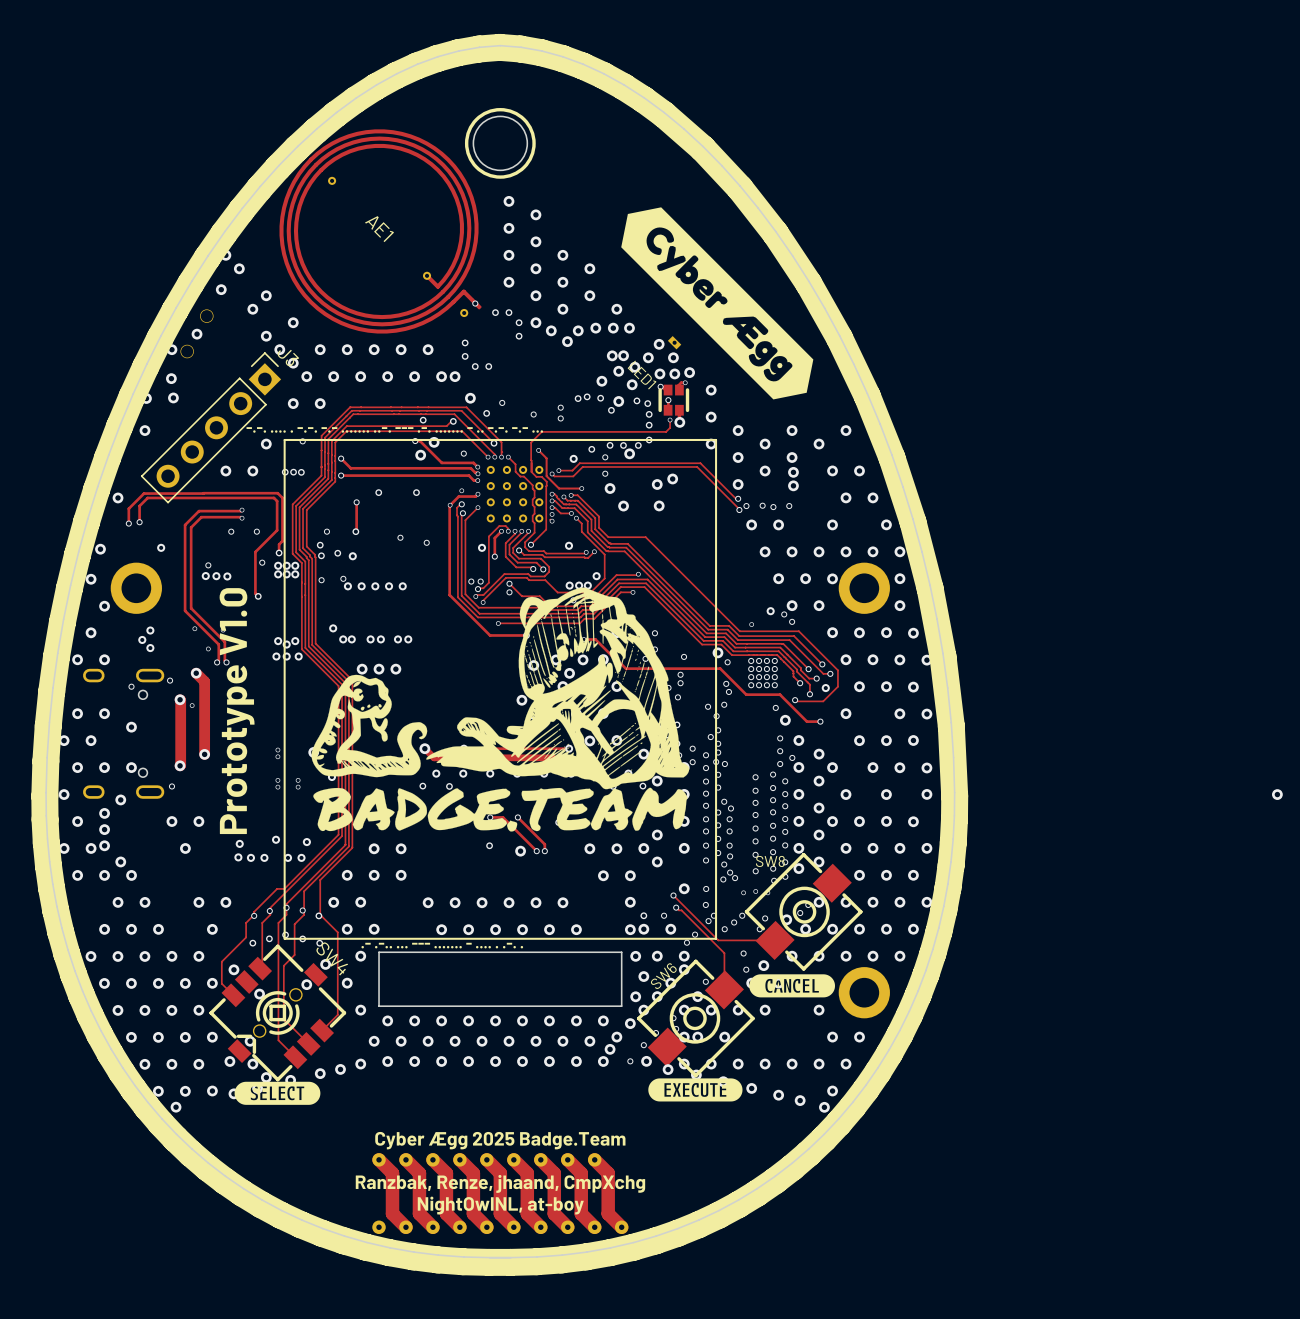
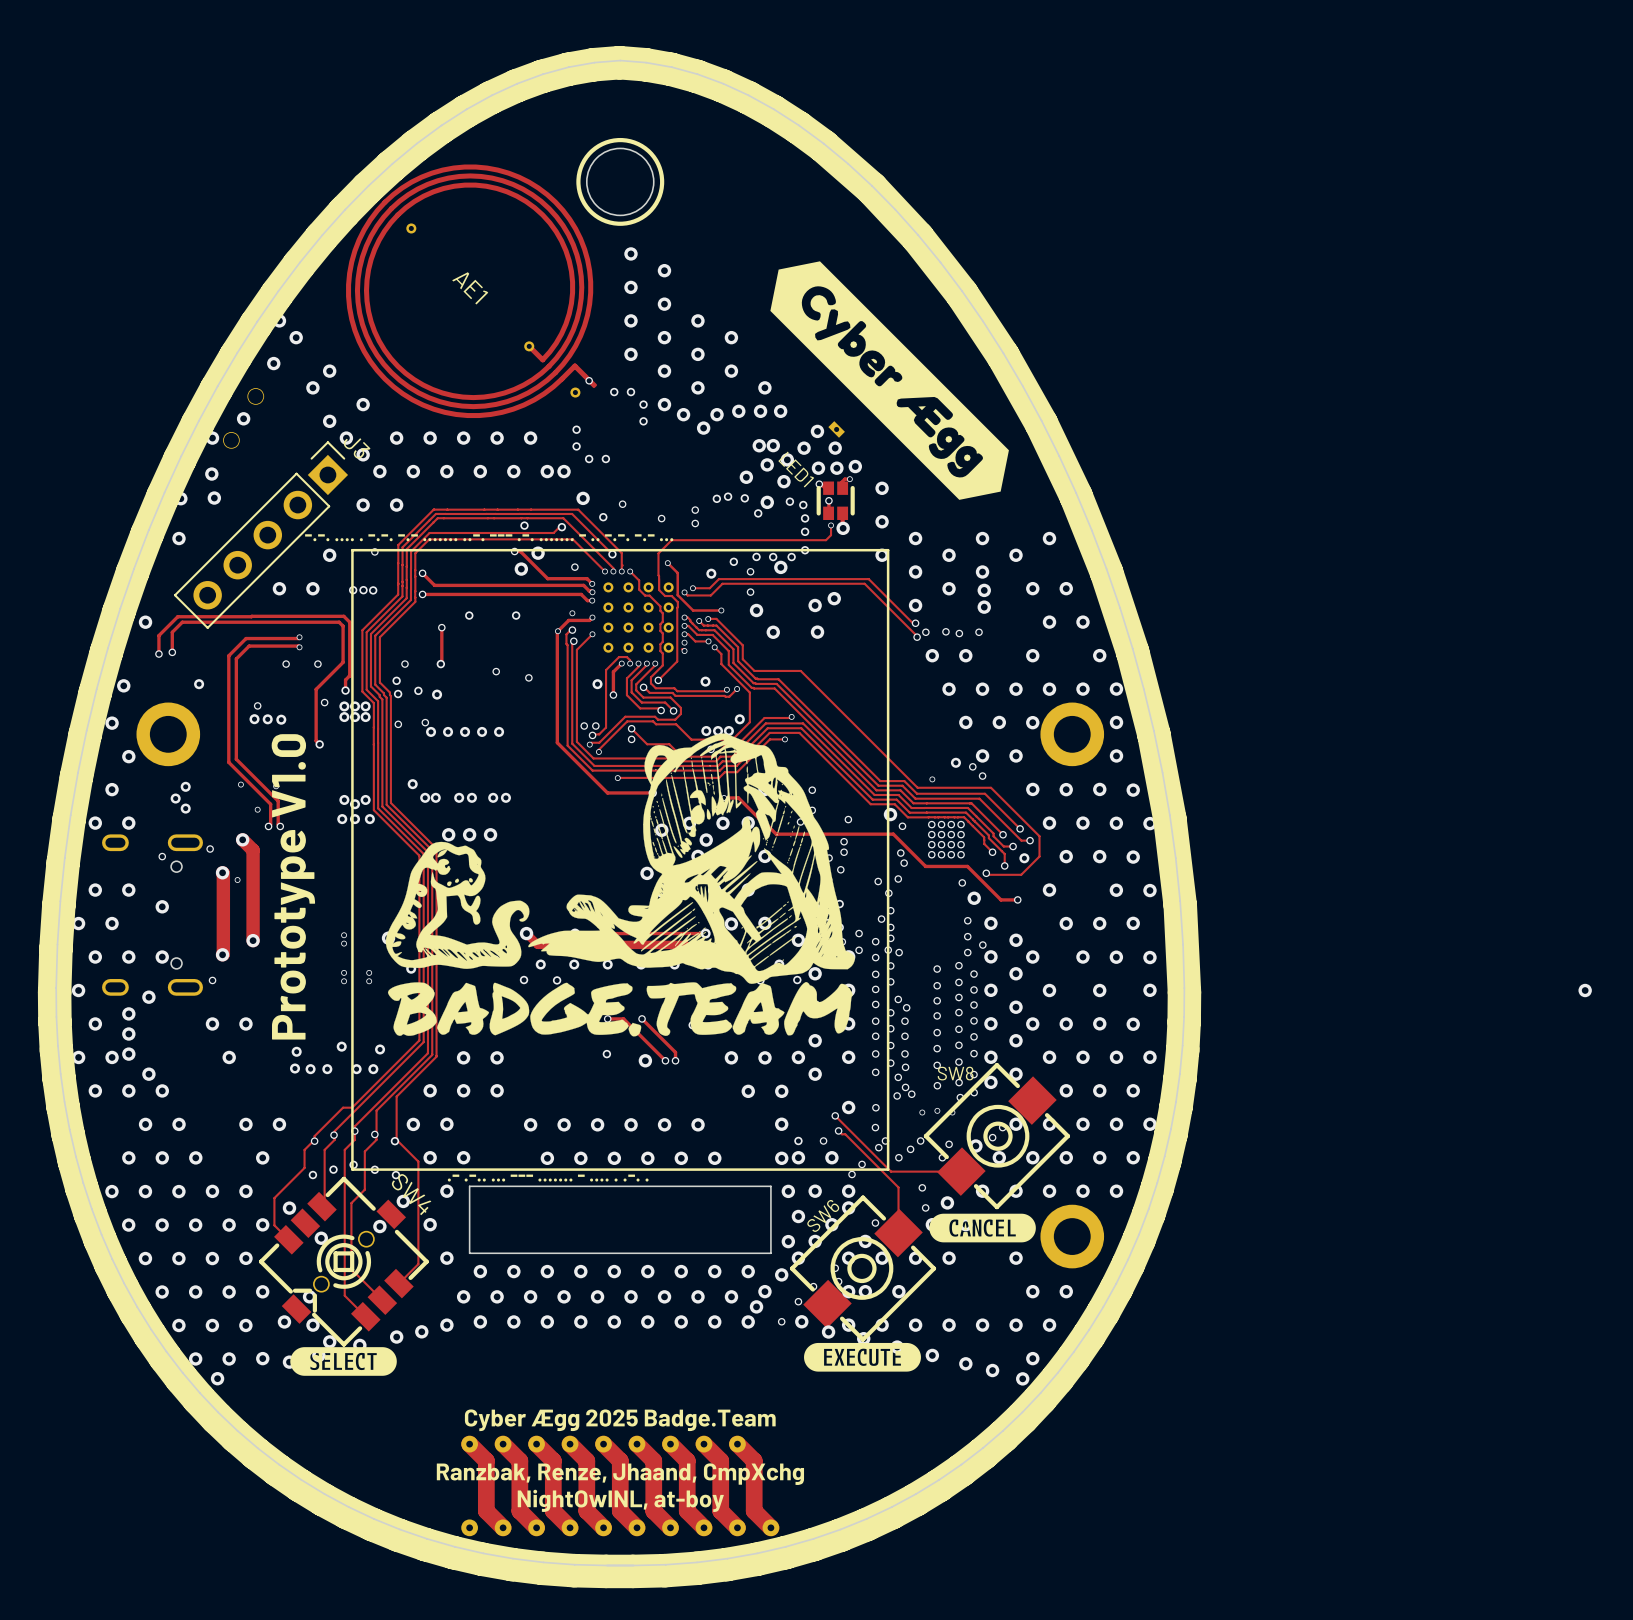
text: Ranzbak, Renze, jhaand, CmpXchg (500, 1183) -> Ranzbak, Renze, Jhaand, CmpXchg (620, 1474)

